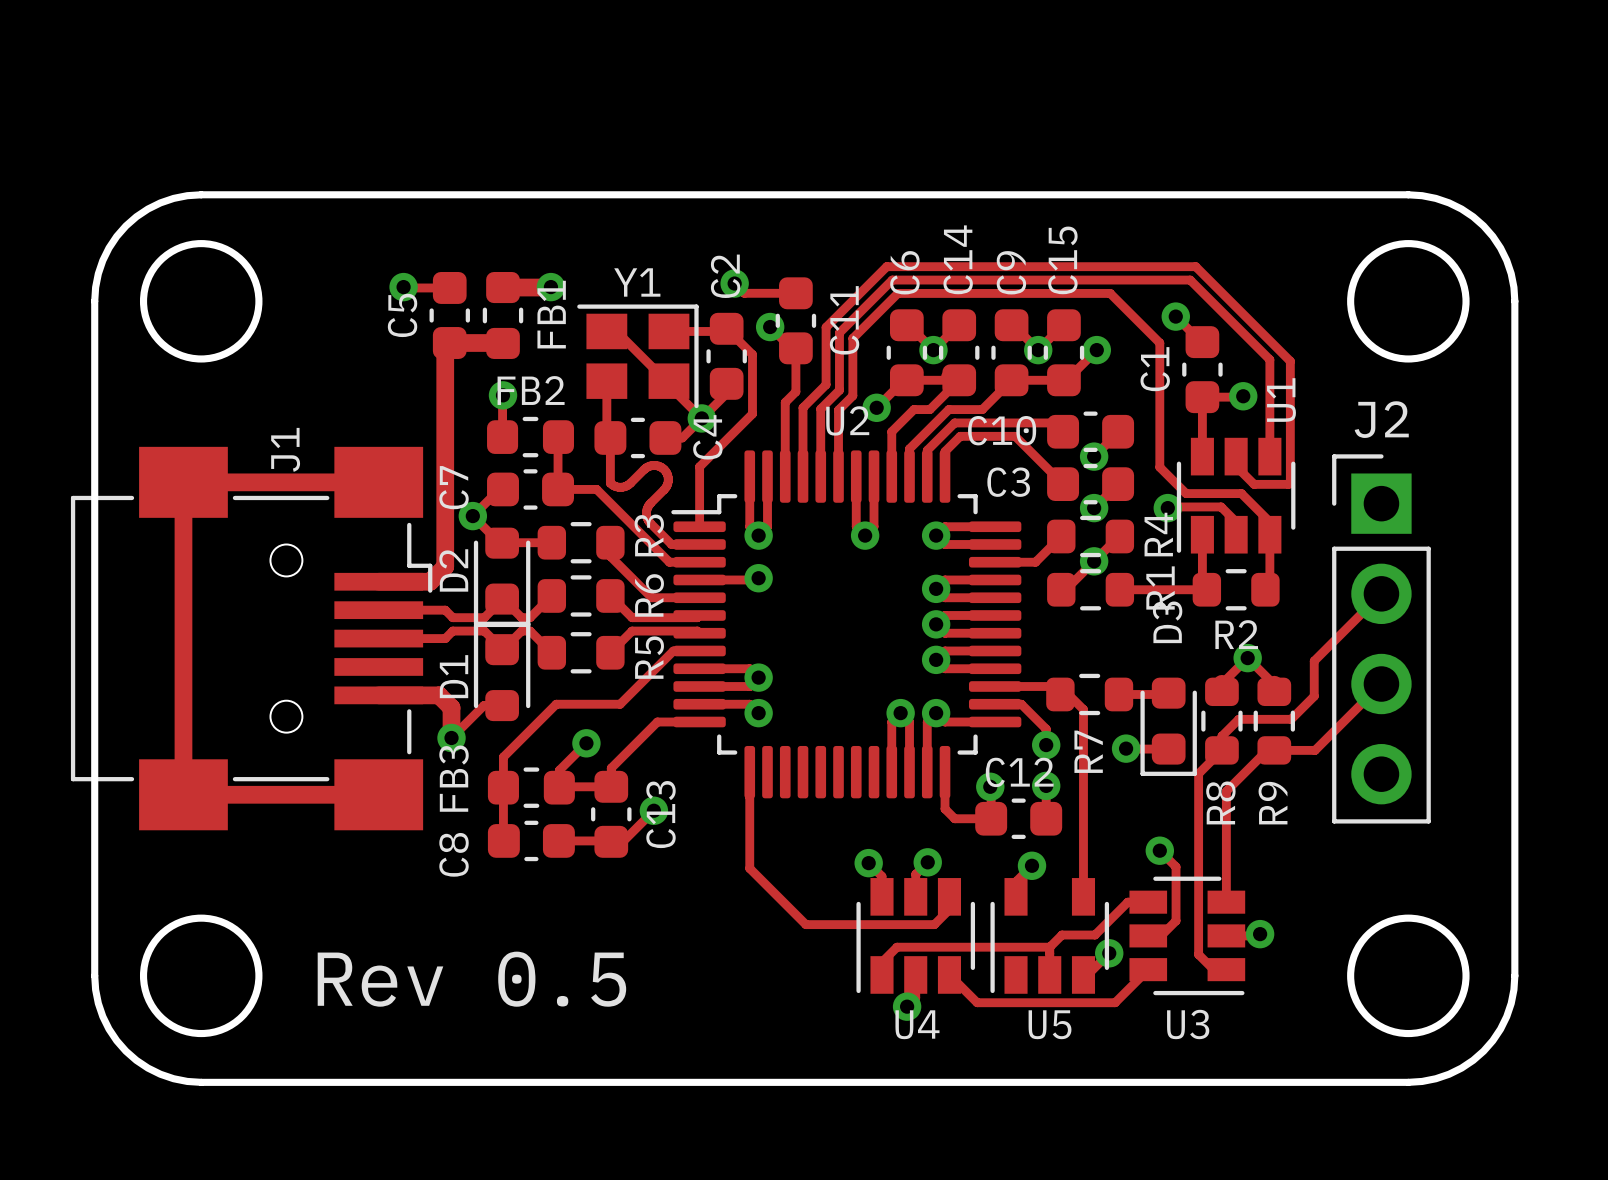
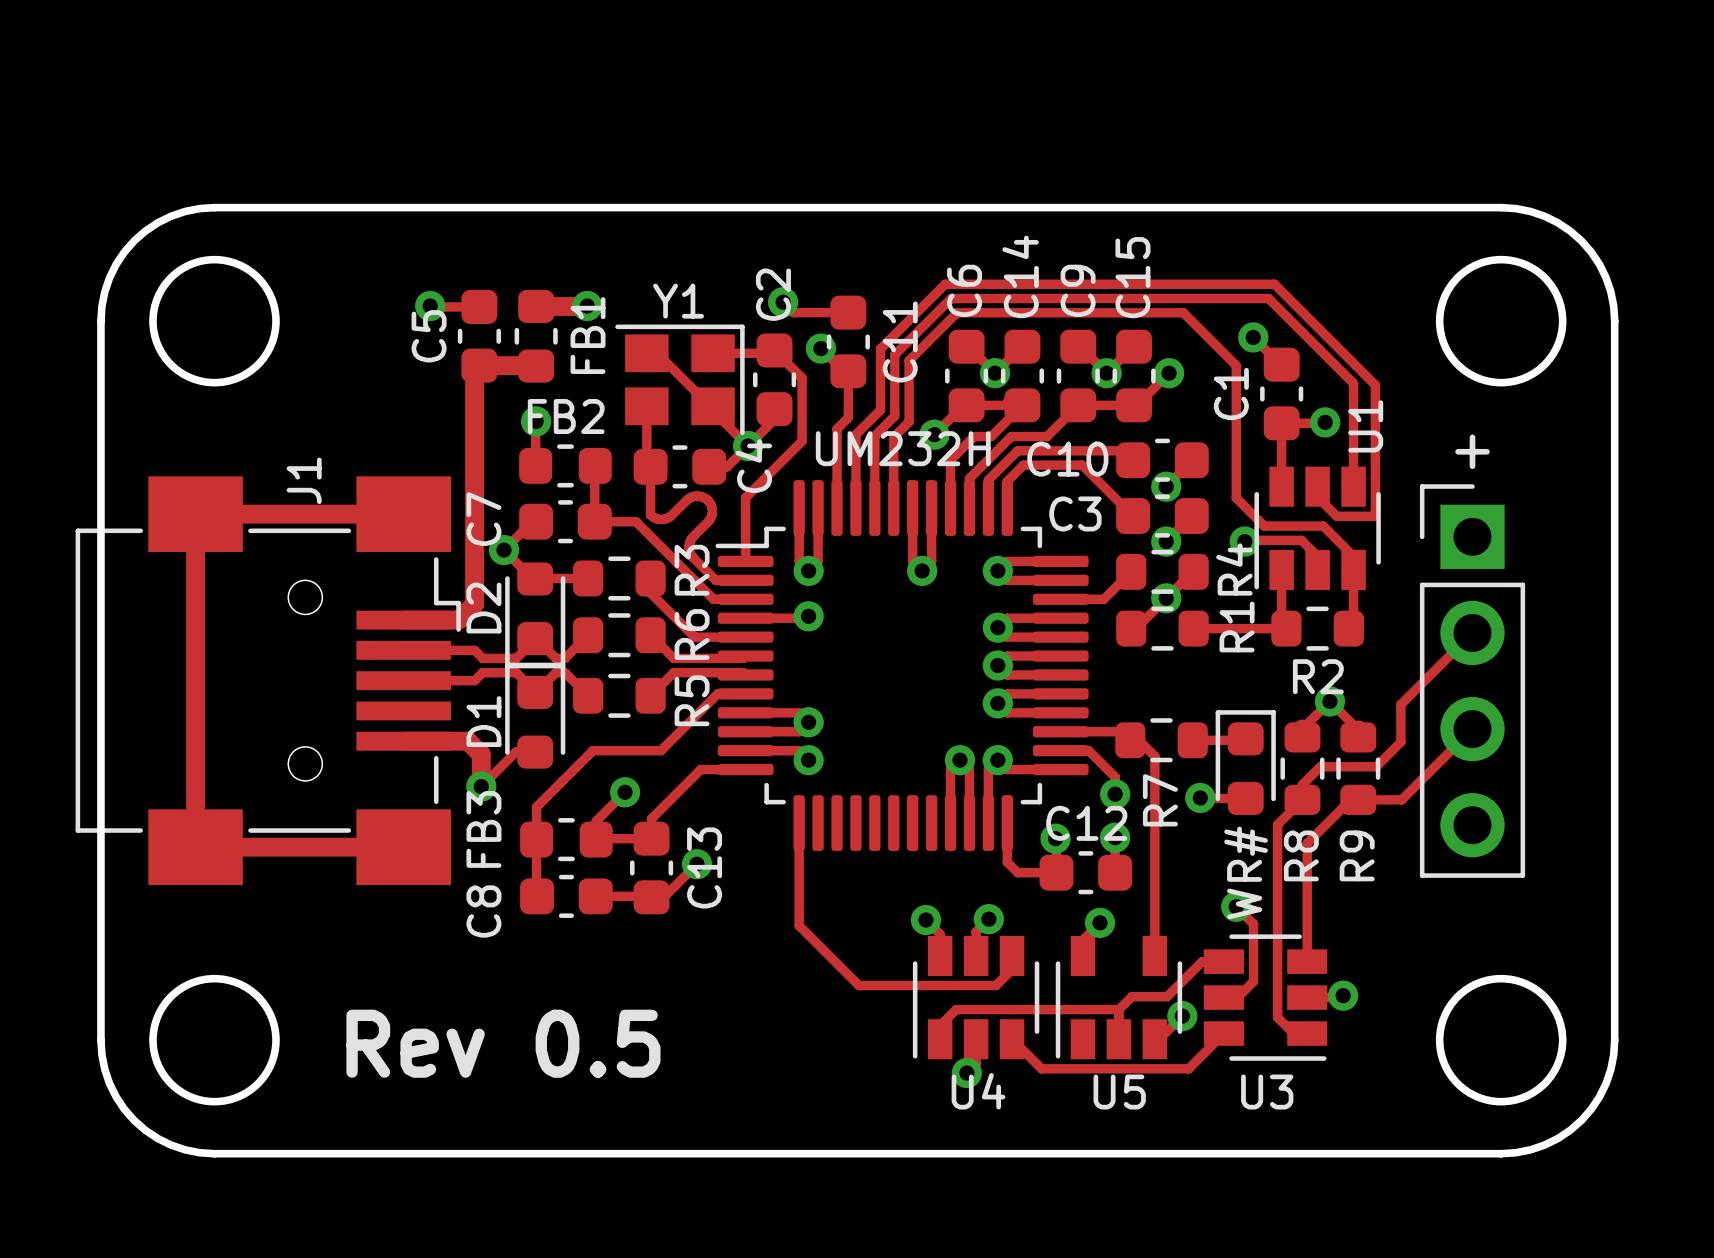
J2 name: J2 (1381, 419) -> + (1472, 451)
U2 name: U2 (847, 420) -> UM232H (903, 448)
WR#: none -> (1245, 762)
D3: (1168, 726) -> none

